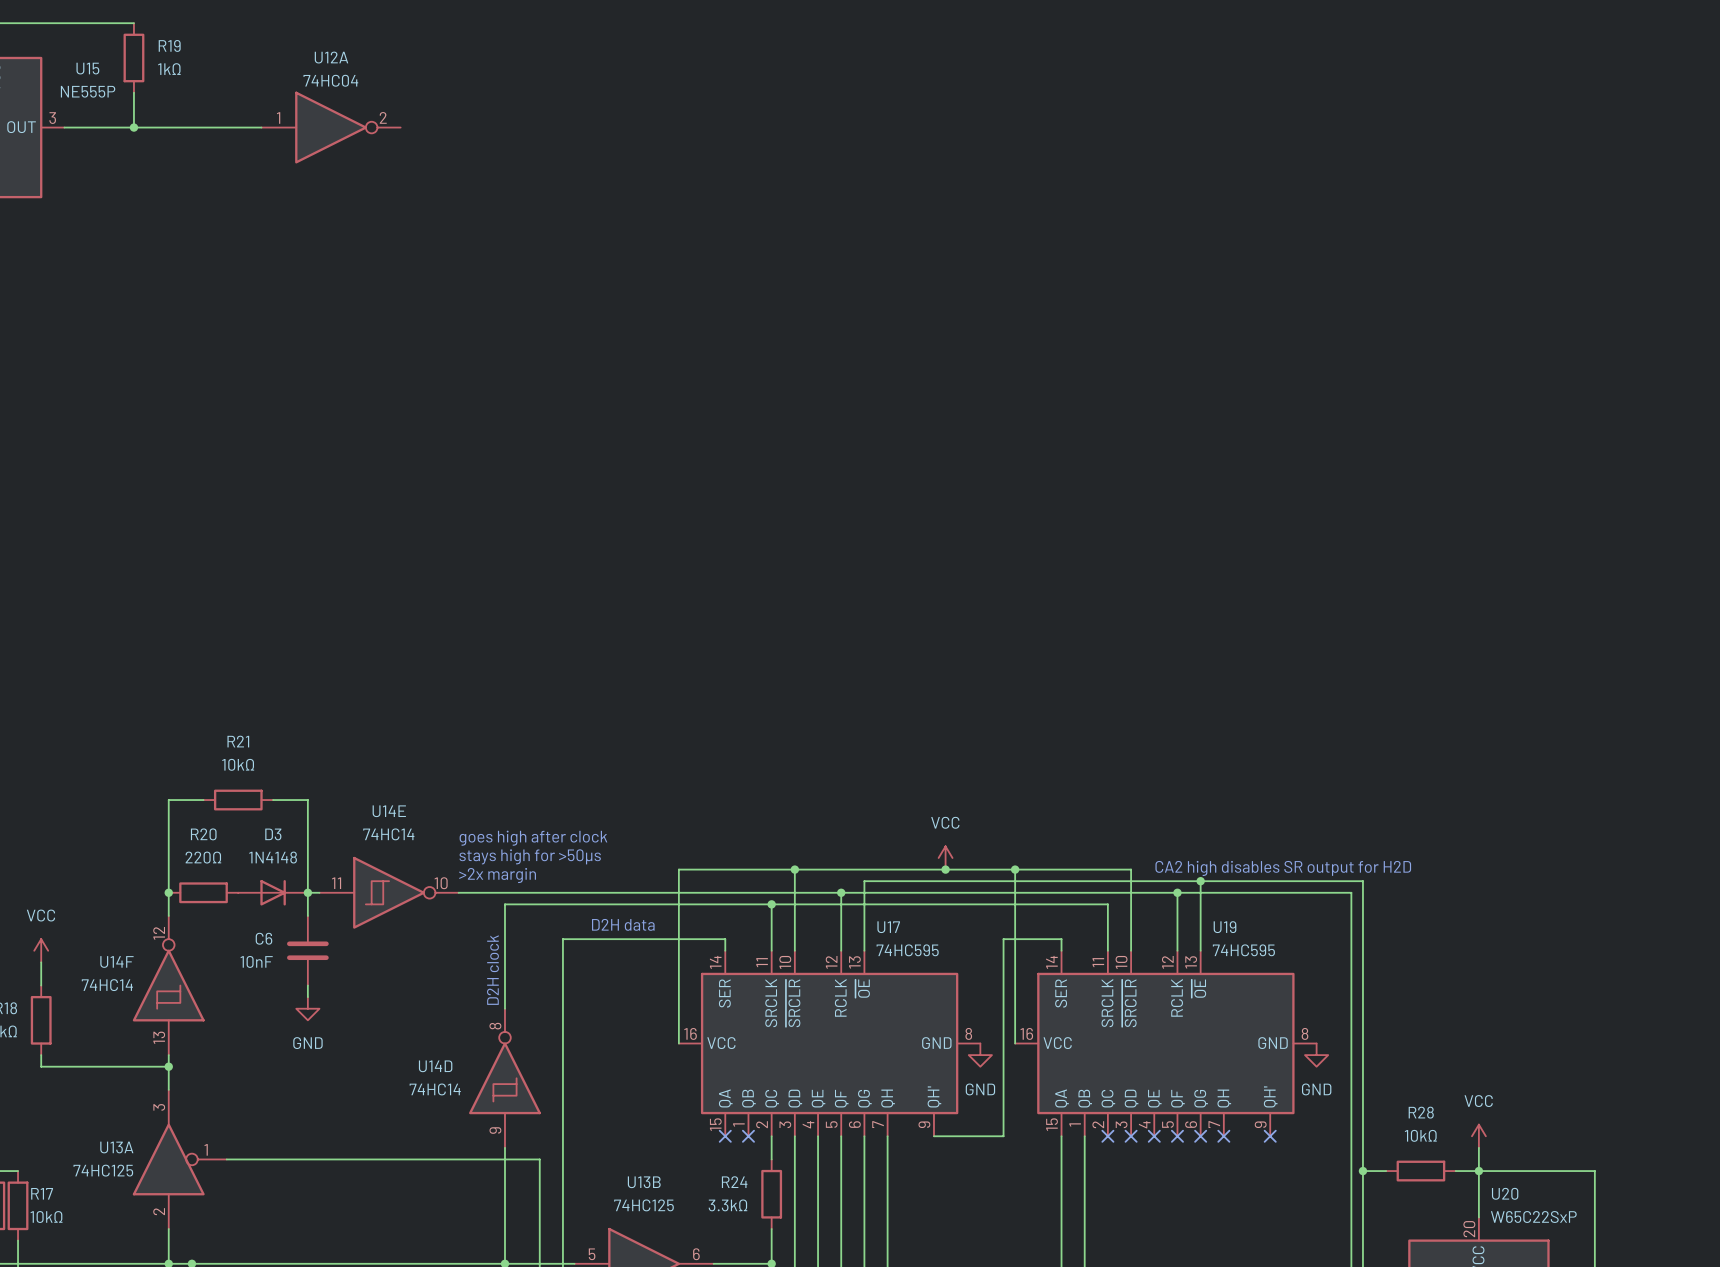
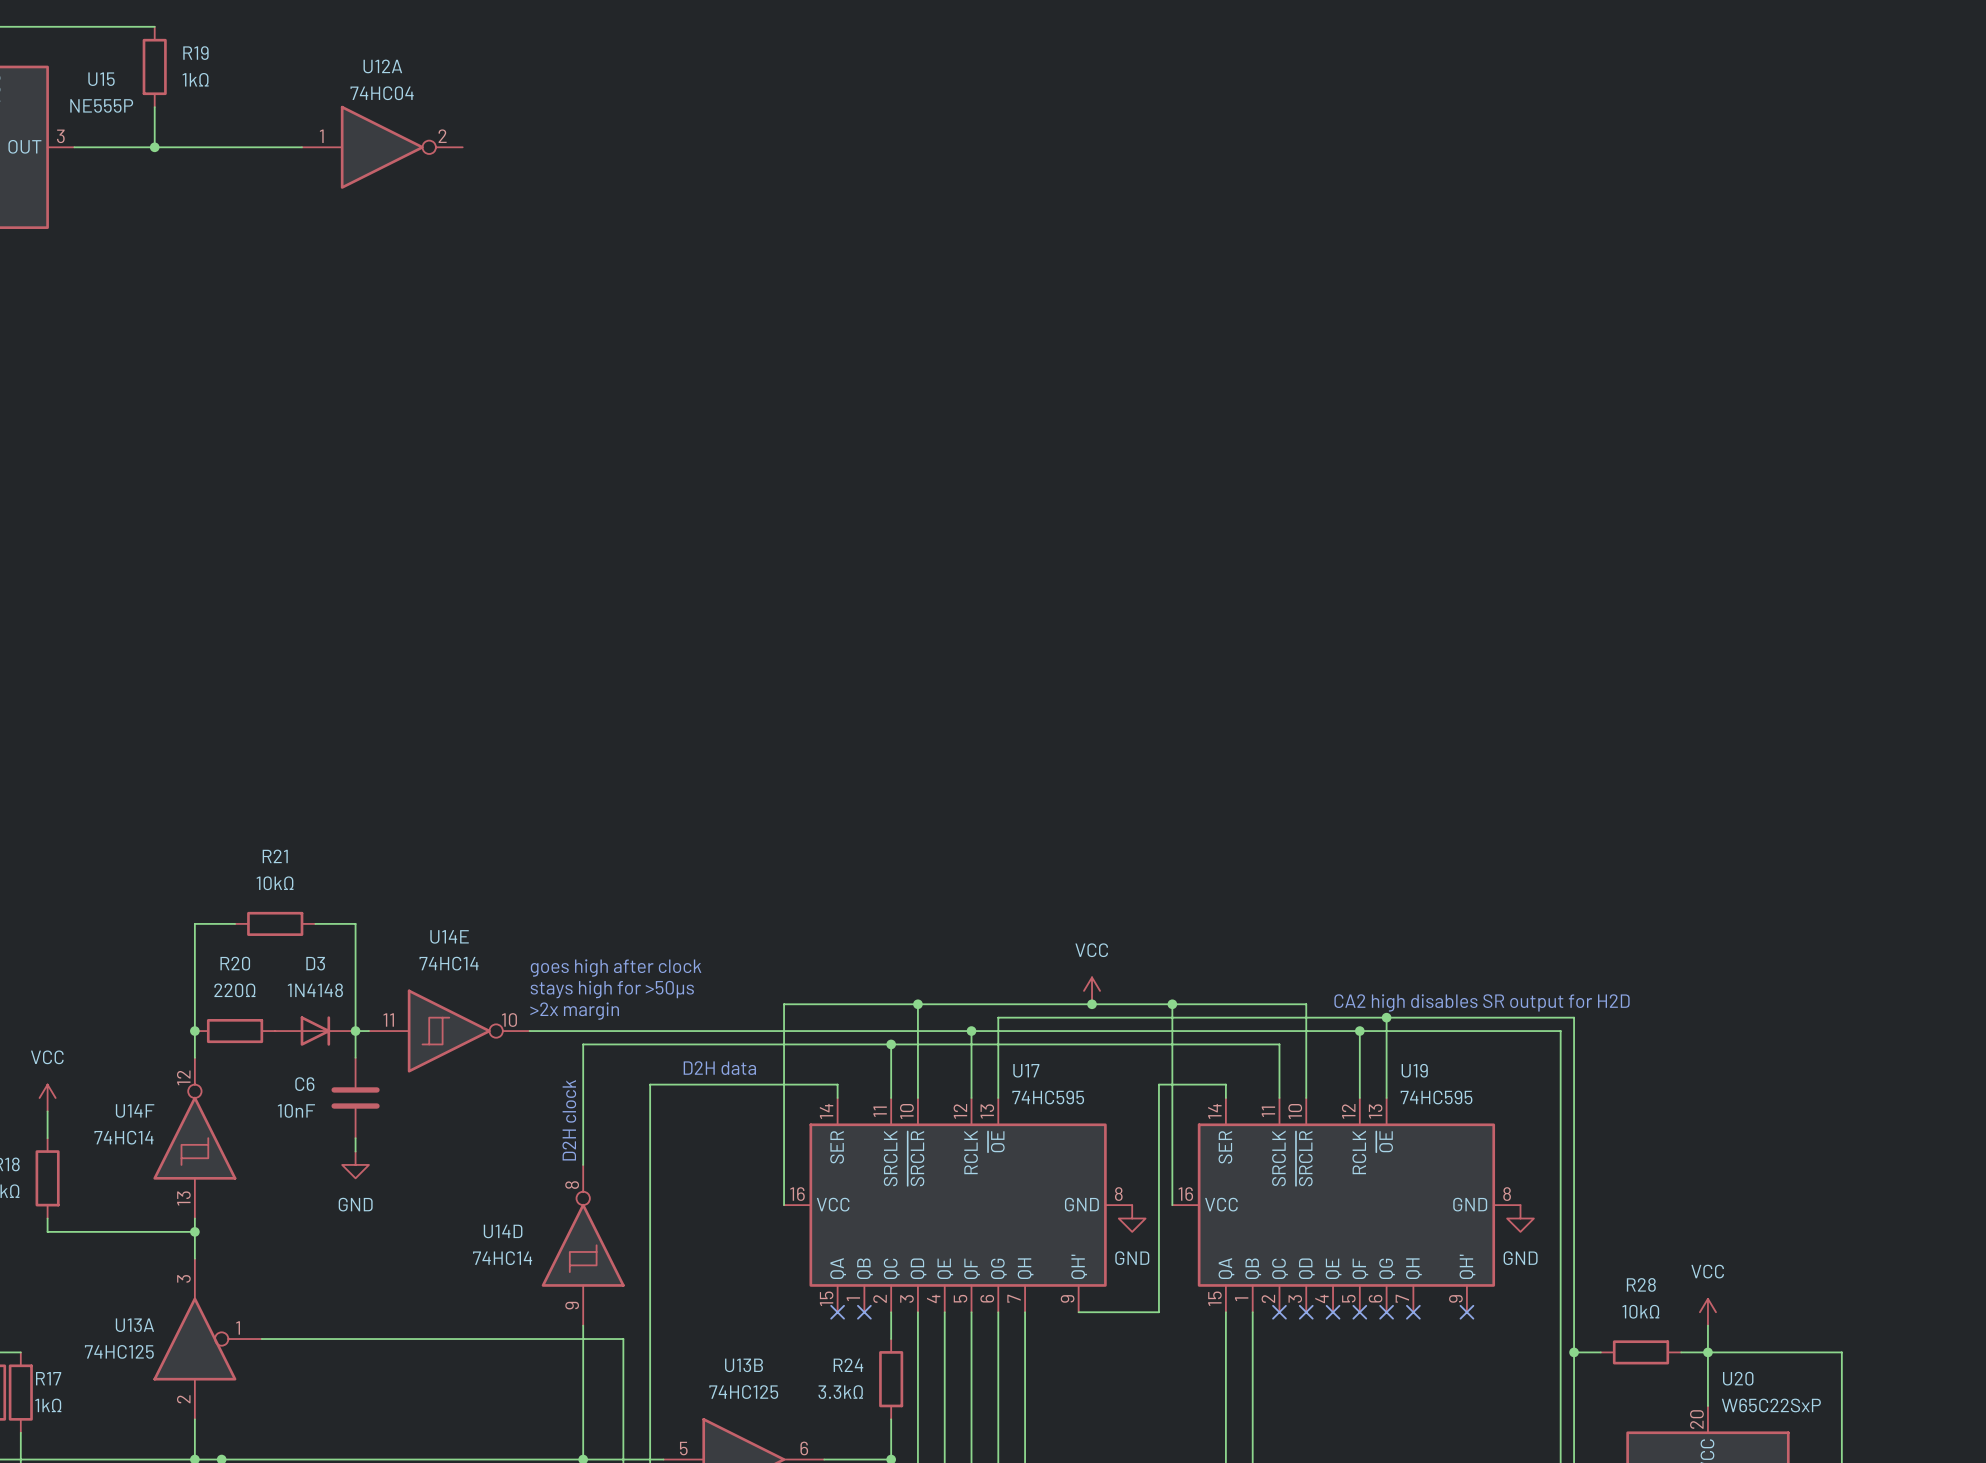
R17 value: 10kΩ (46, 1217) -> 1kΩ (48, 1405)

